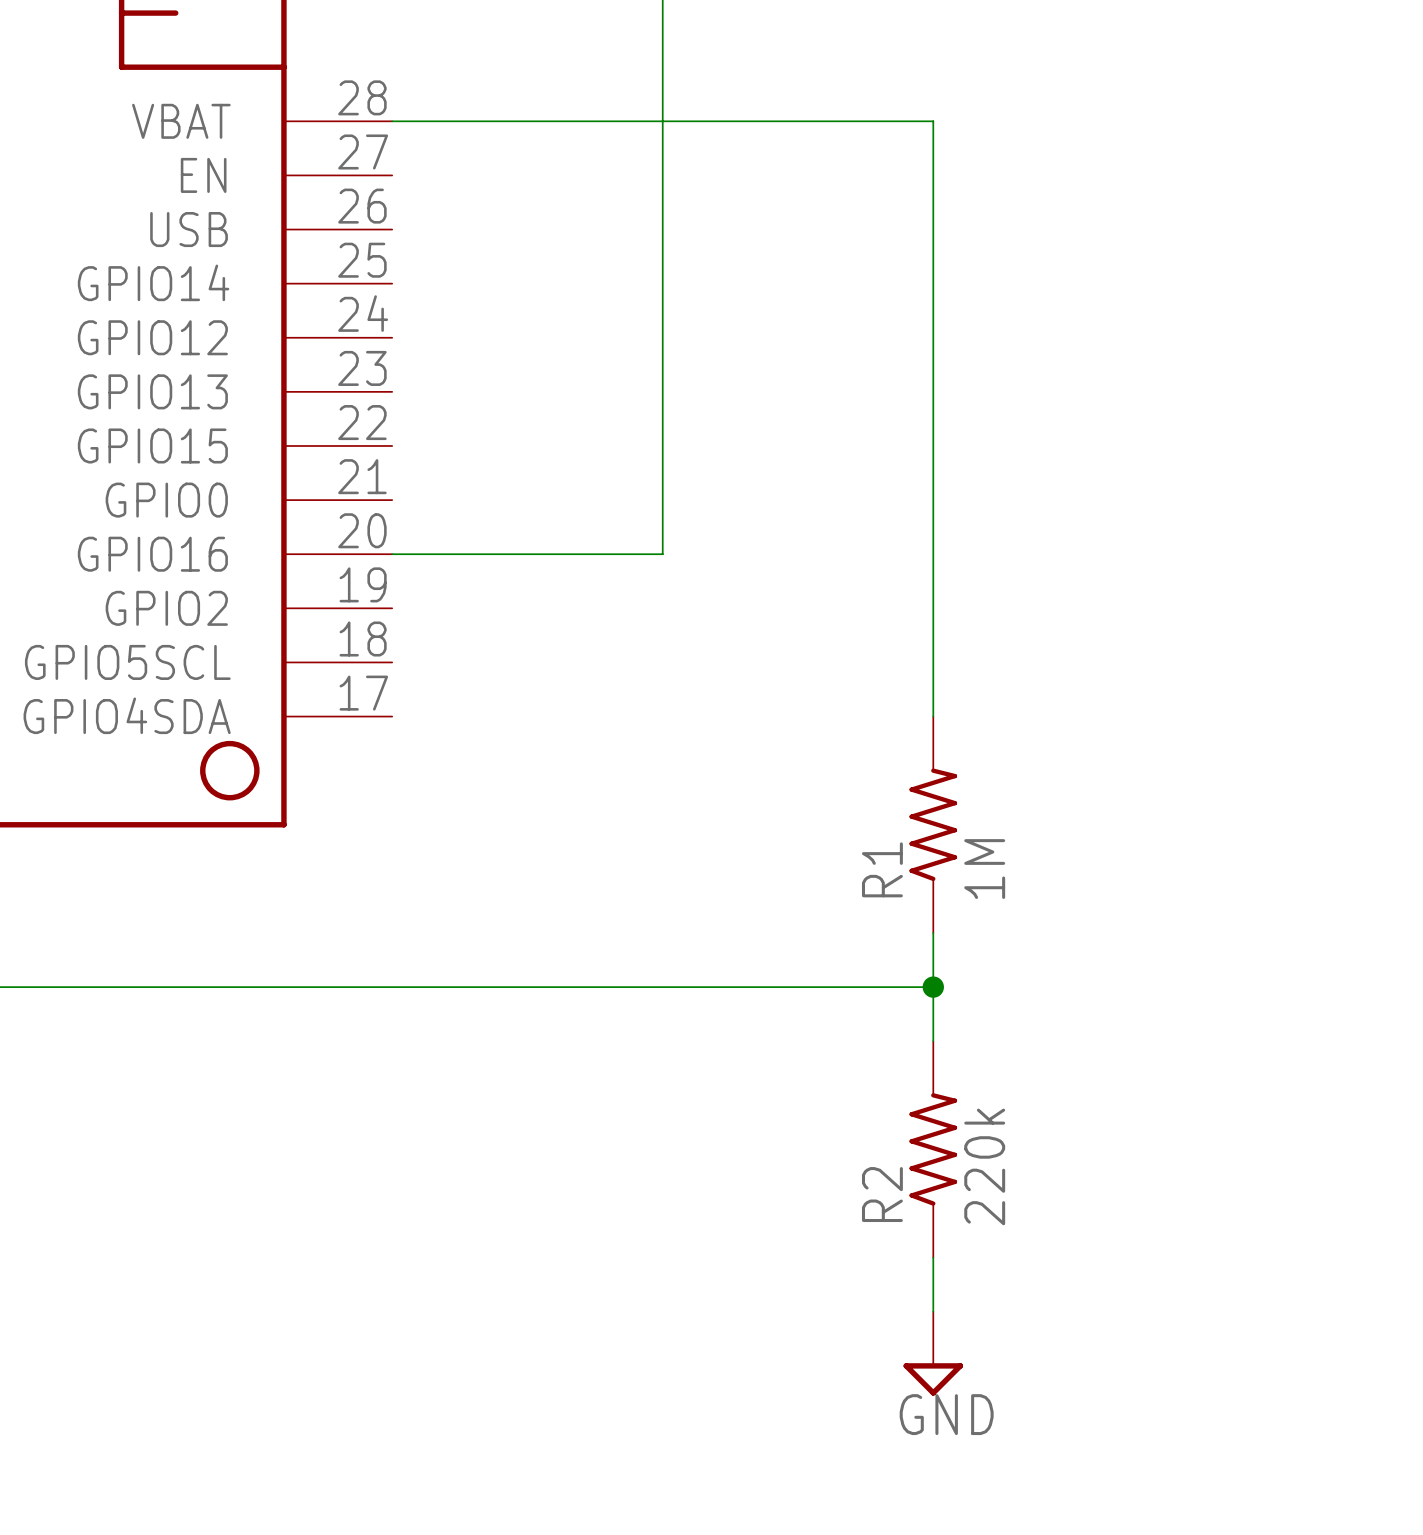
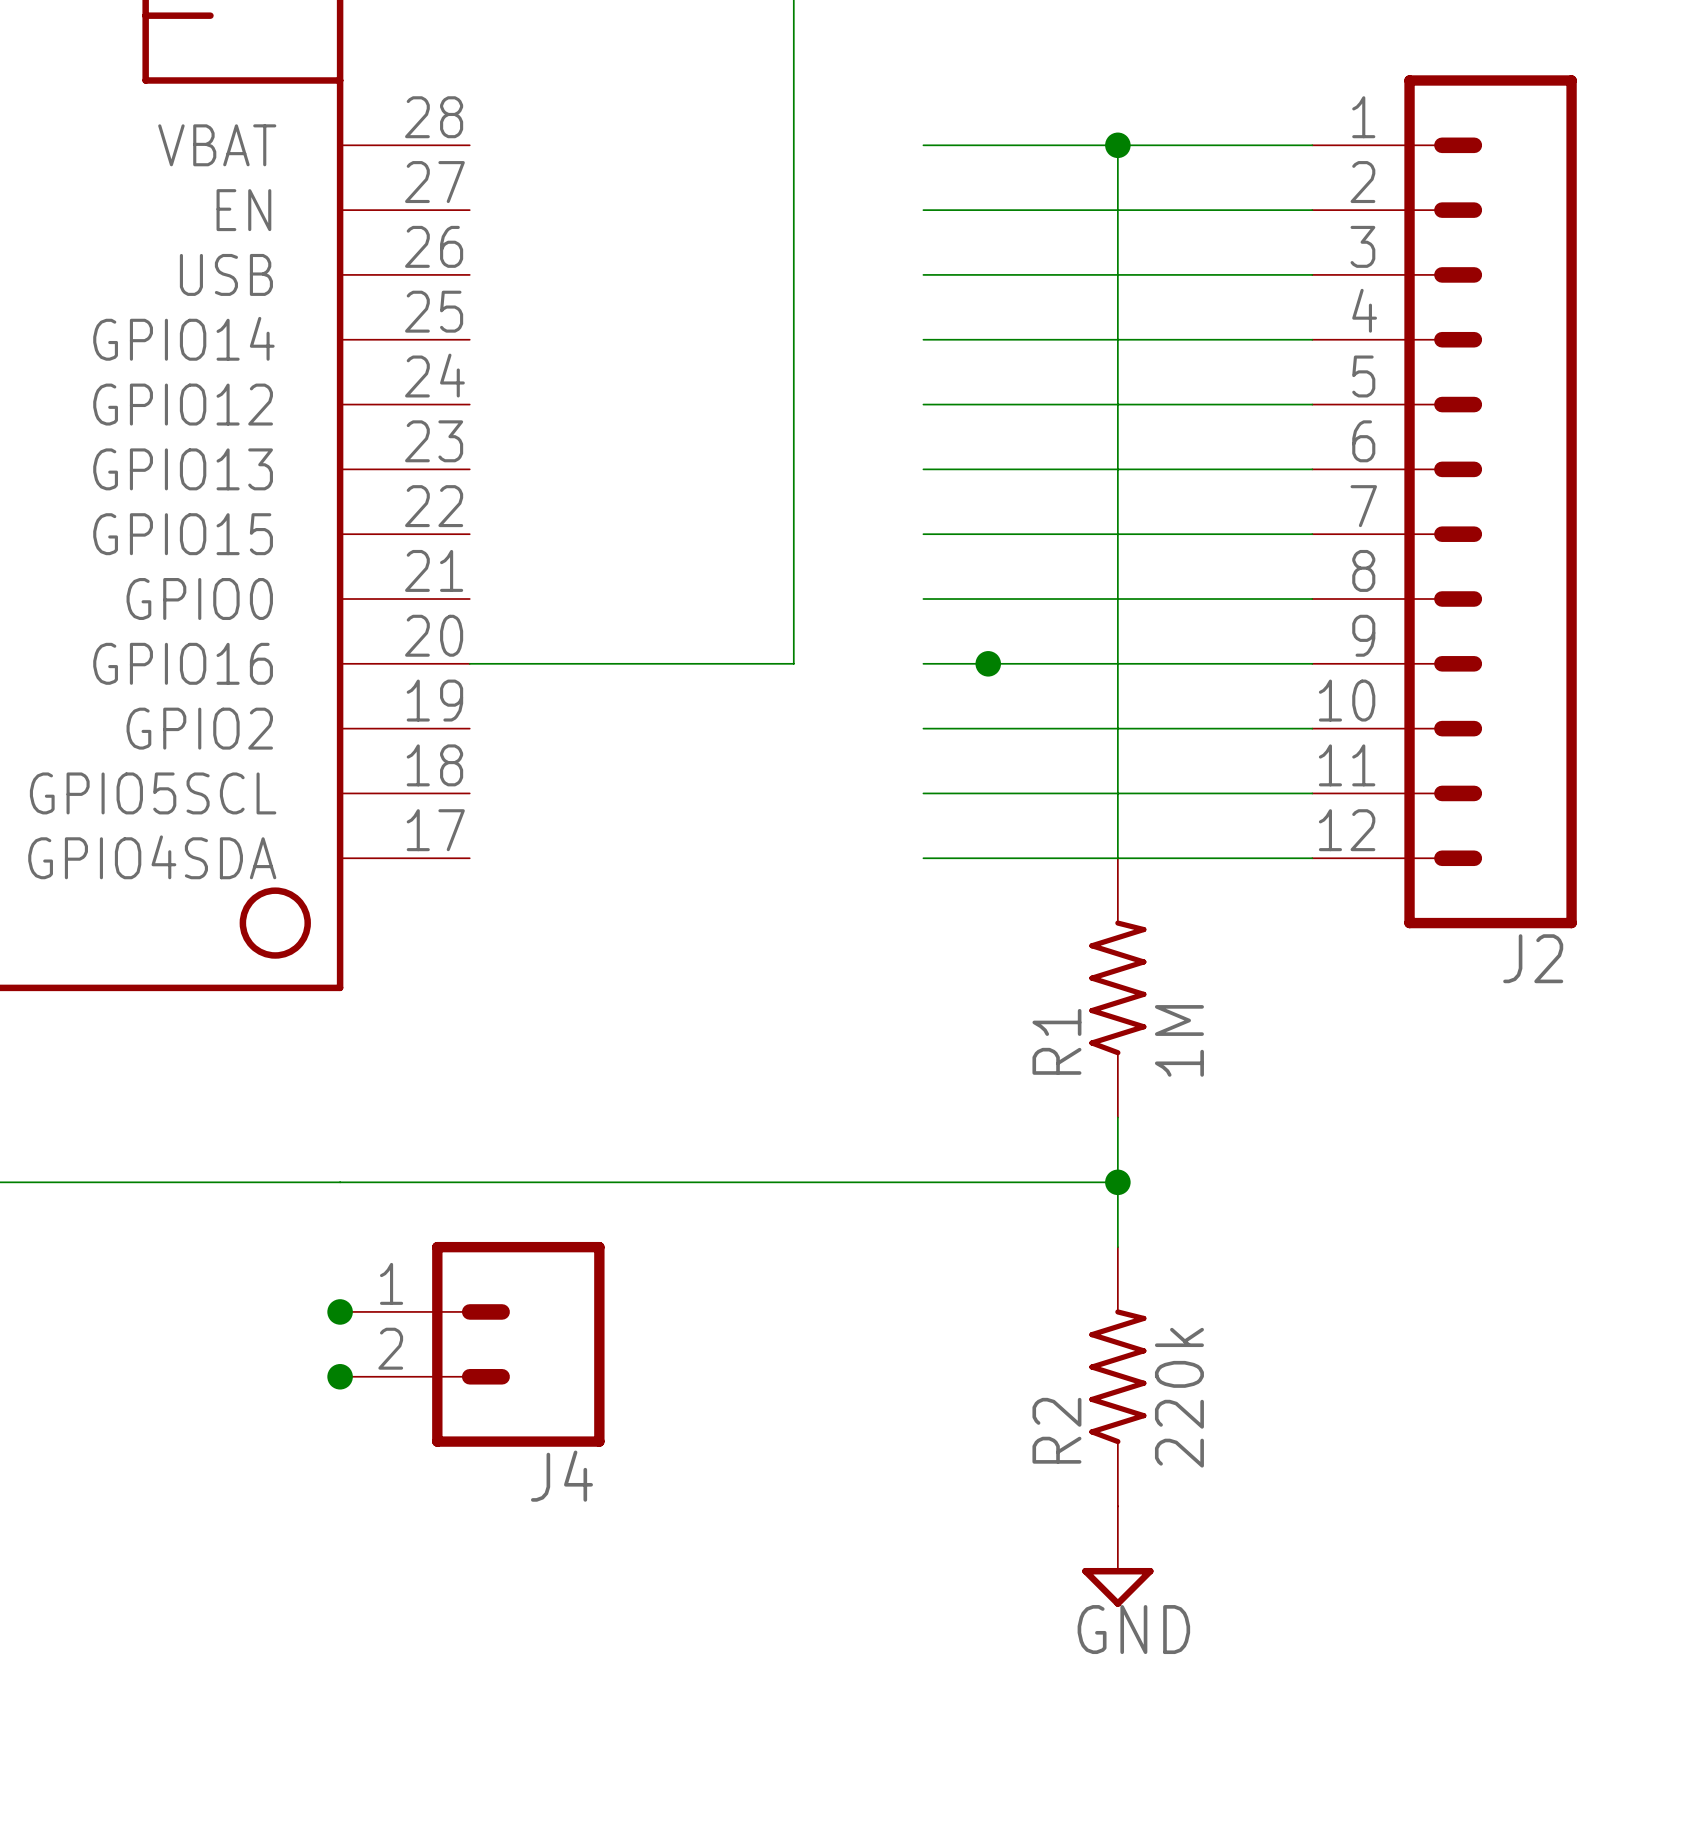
wire: (392, 121) (770, 121) -> none
wire: none -> (1117, 145) (1312, 145)
junction: none -> (1117, 145)
wire: none -> (923, 210) (1312, 210)
wire: none -> (923, 274) (1312, 274)
wire: none -> (923, 339) (1312, 339)
wire: none -> (923, 404) (1312, 404)
wire: none -> (923, 469) (1312, 469)
J2: none -> (1444, 501)
wire: none -> (923, 534) (1312, 534)
wire: none -> (923, 599) (1312, 599)
wire: none -> (923, 663) (1312, 663)
junction: none -> (988, 663)
wire: none -> (923, 728) (1312, 728)
wire: none -> (923, 793) (1312, 793)
wire: none -> (923, 858) (1312, 858)
junction: none -> (340, 1311)
J4: none -> (472, 1344)
junction: none -> (340, 1376)
power symbol position: GND (933, 1353) -> GND (1117, 1556)

